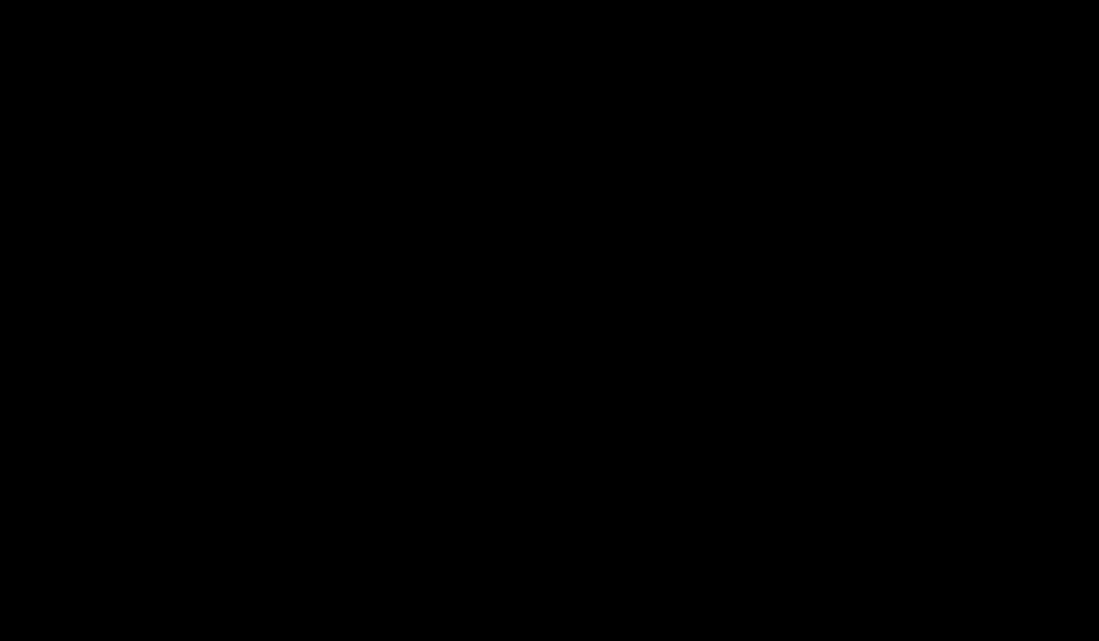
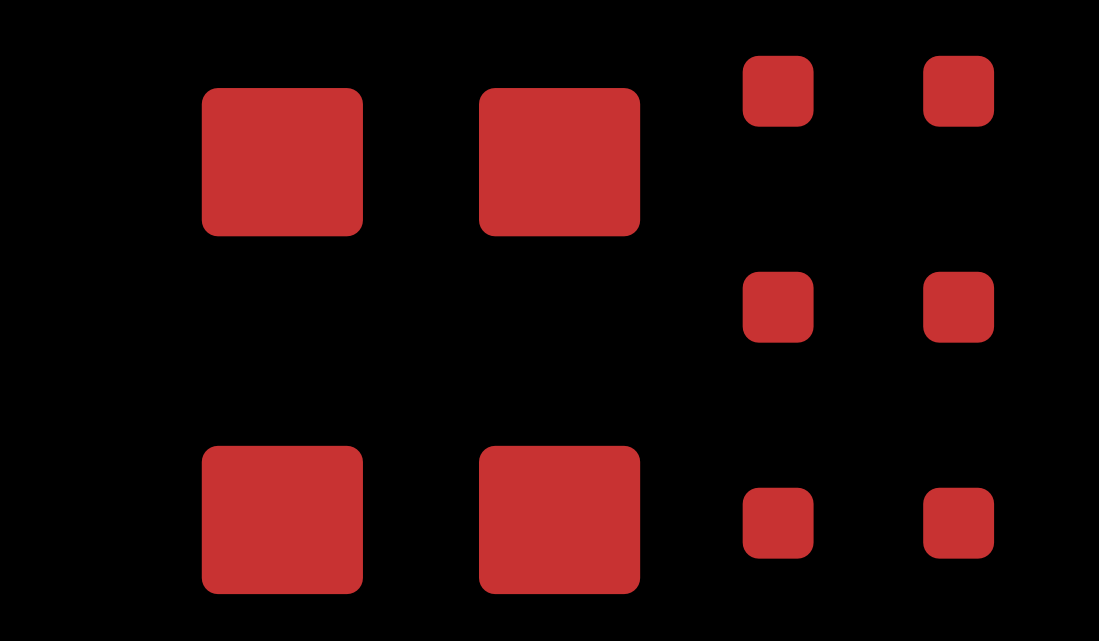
part: none -> (868, 91)
part: none -> (420, 162)
part: none -> (868, 307)
part: none -> (420, 519)
part: none -> (868, 523)

